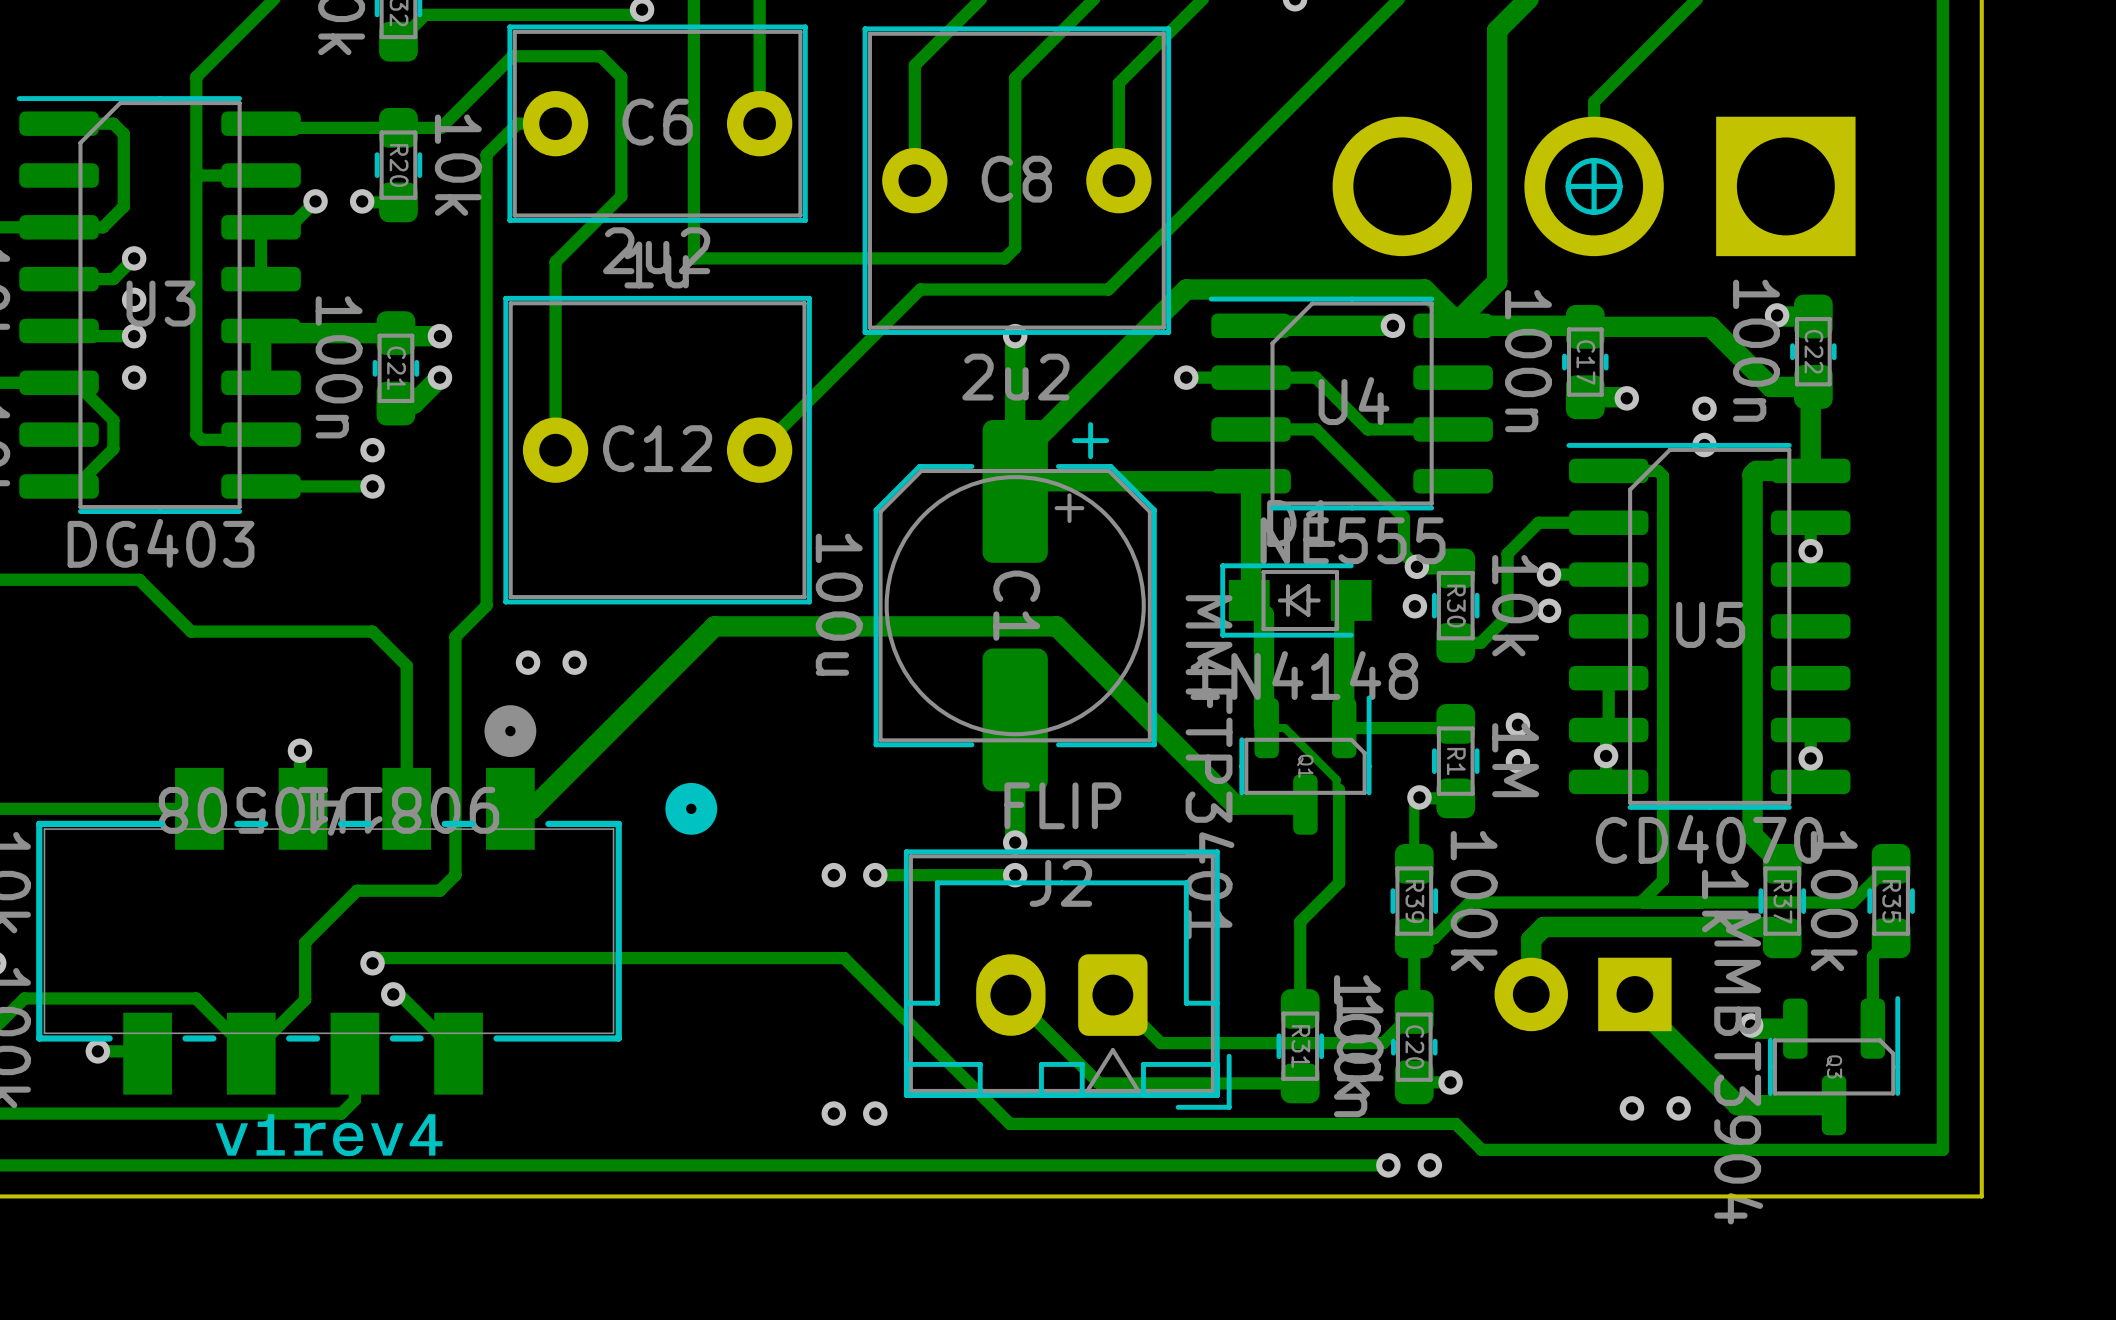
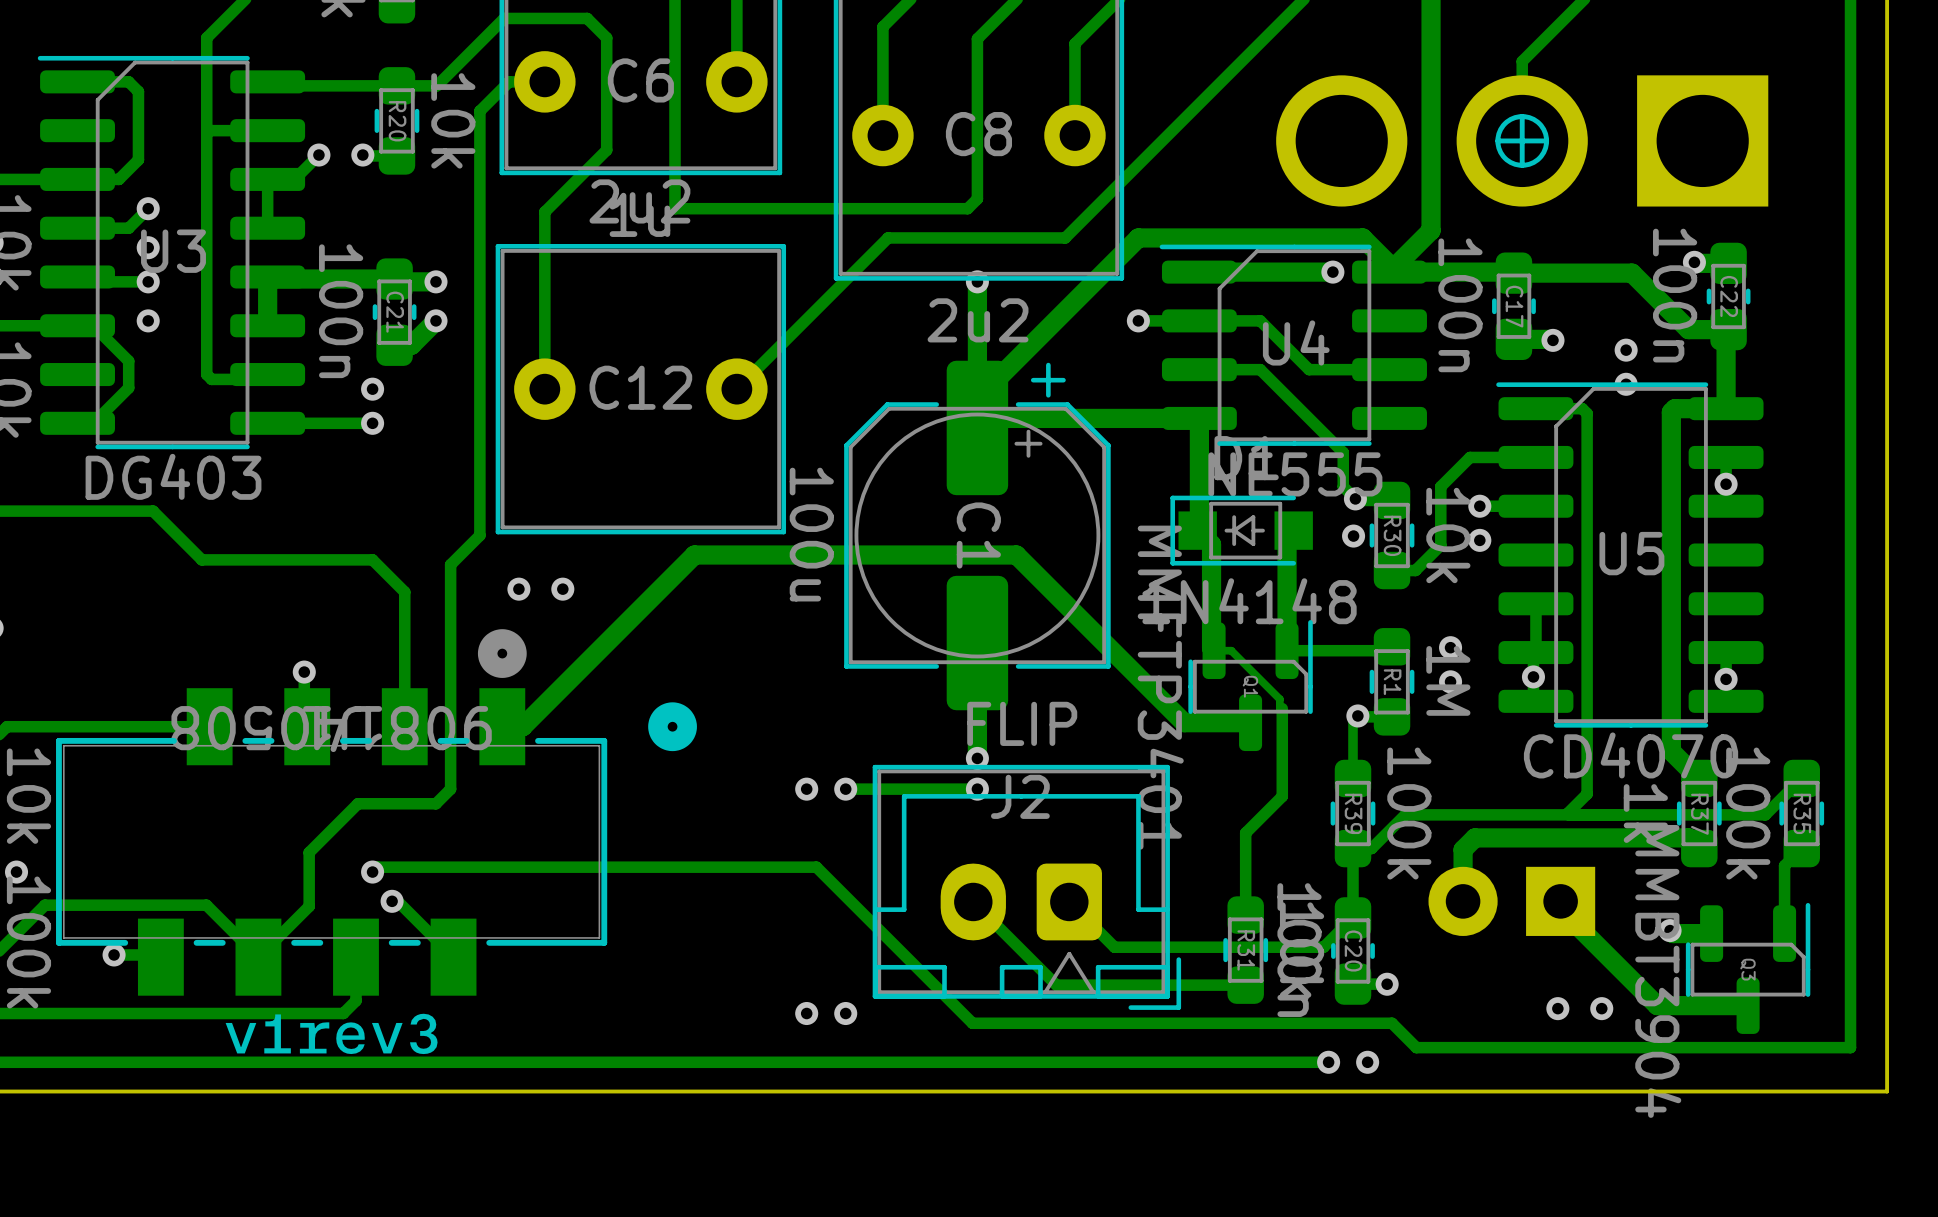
drawing shape: [215, 1114, 443, 1157] -> [225, 1013, 438, 1055]

